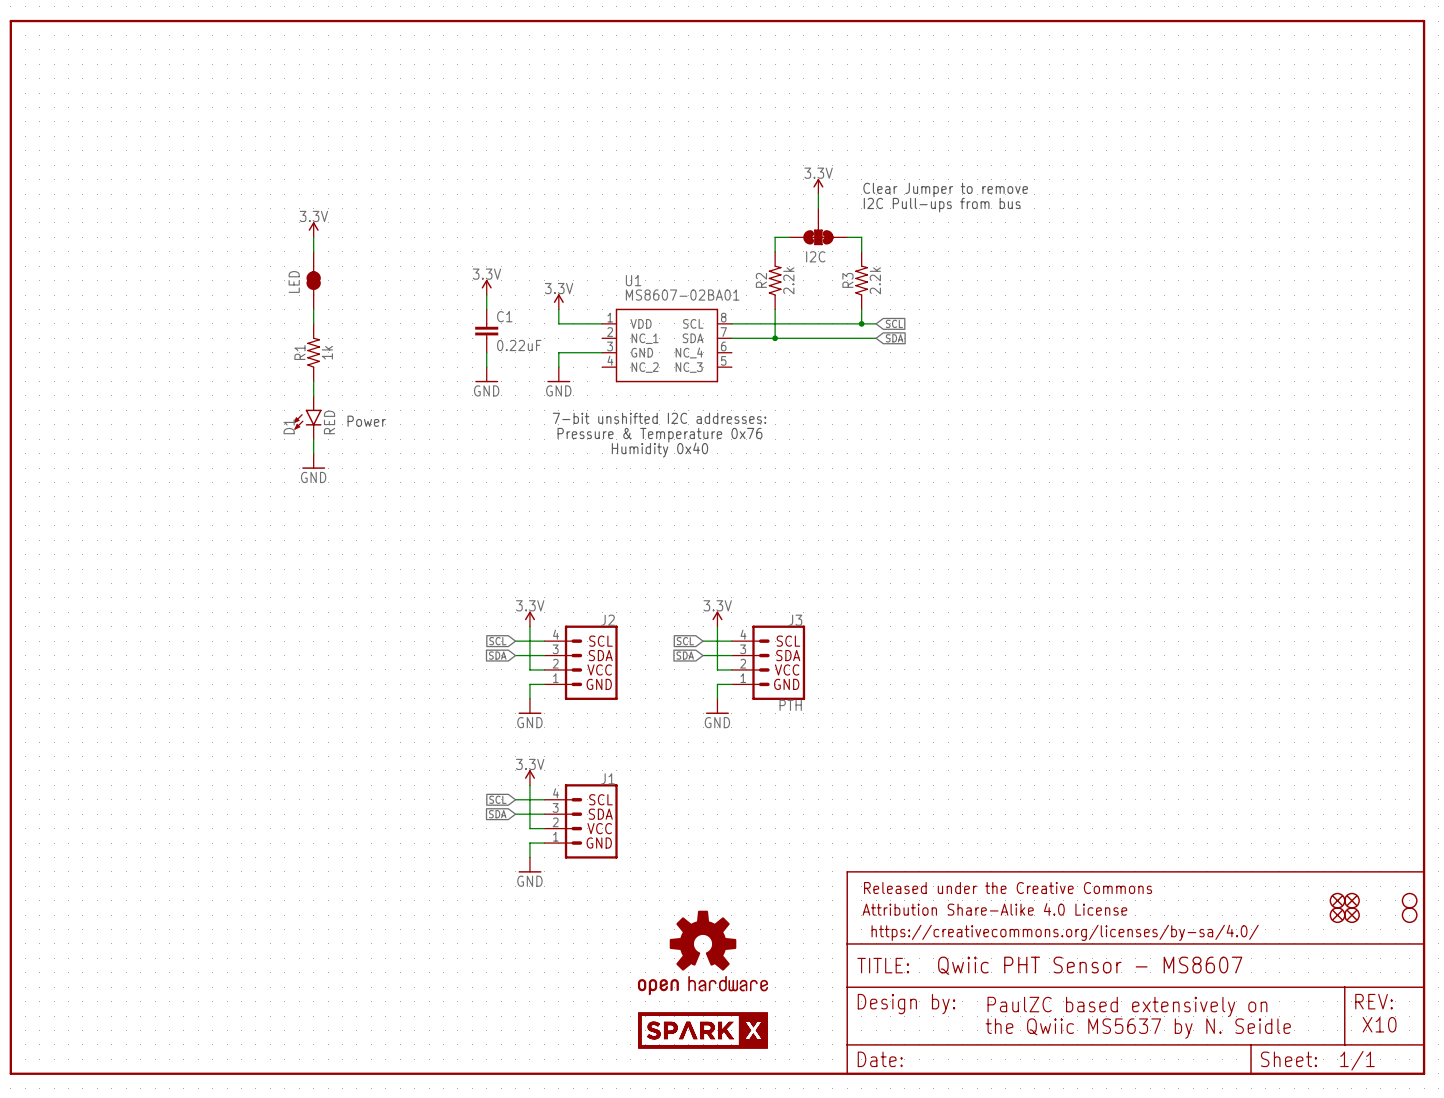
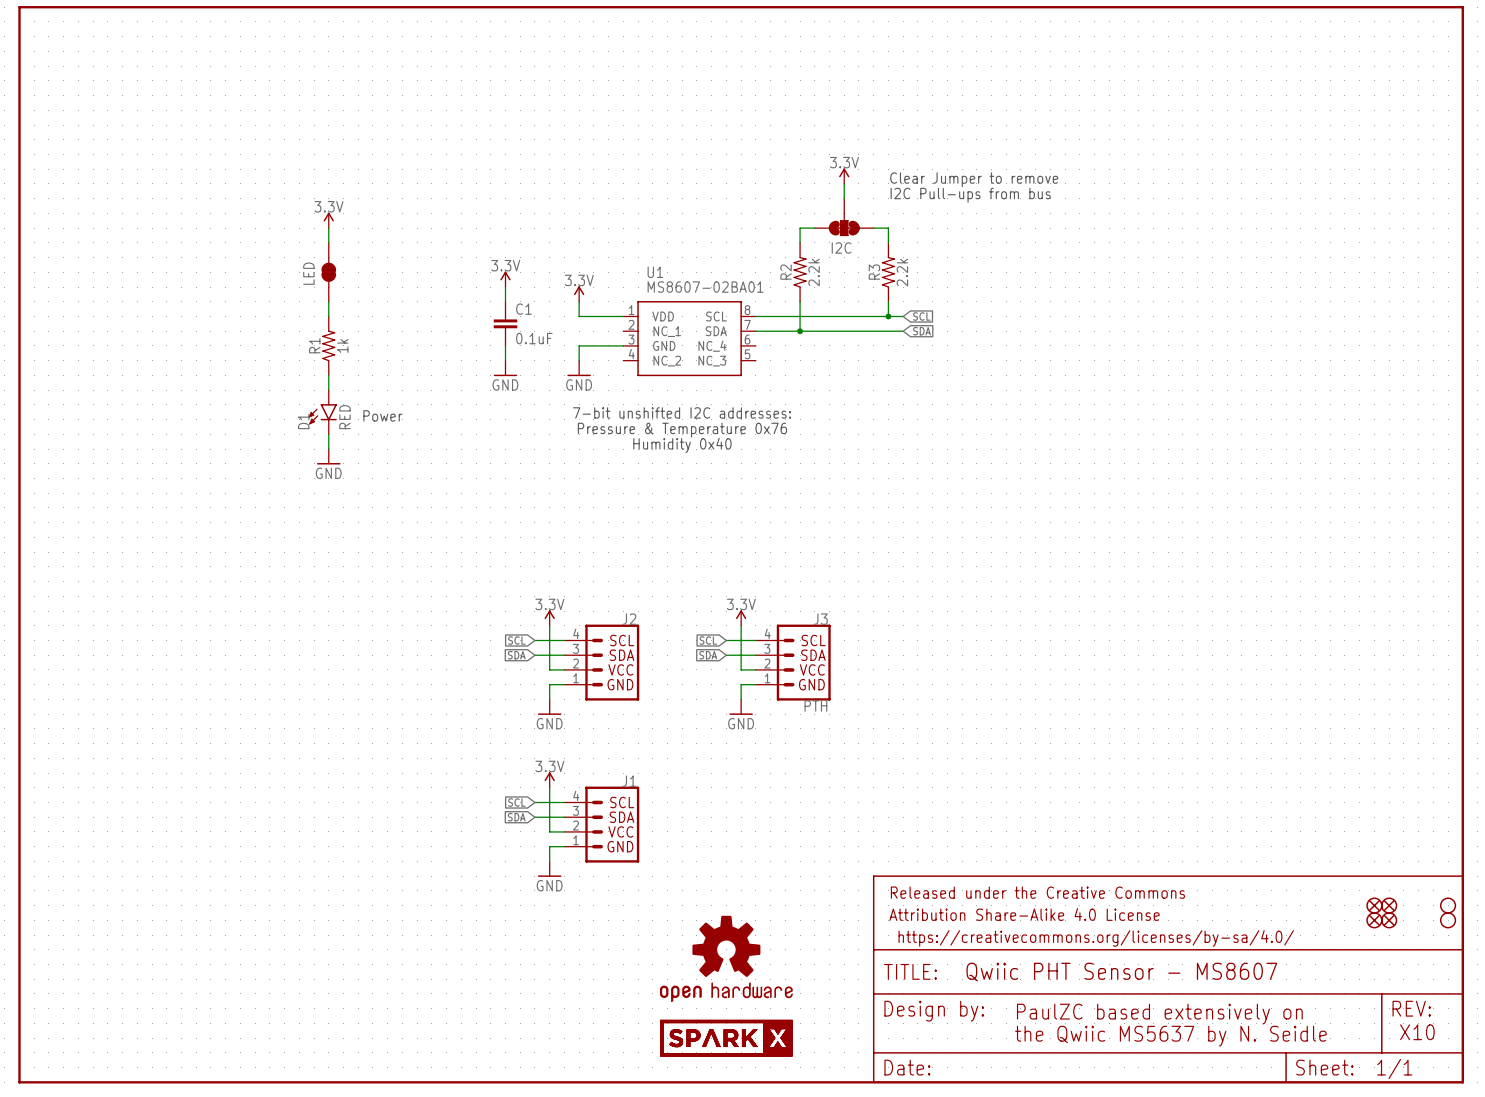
C1 value: 0.22uF (519, 345) -> 0.1uF (534, 338)

